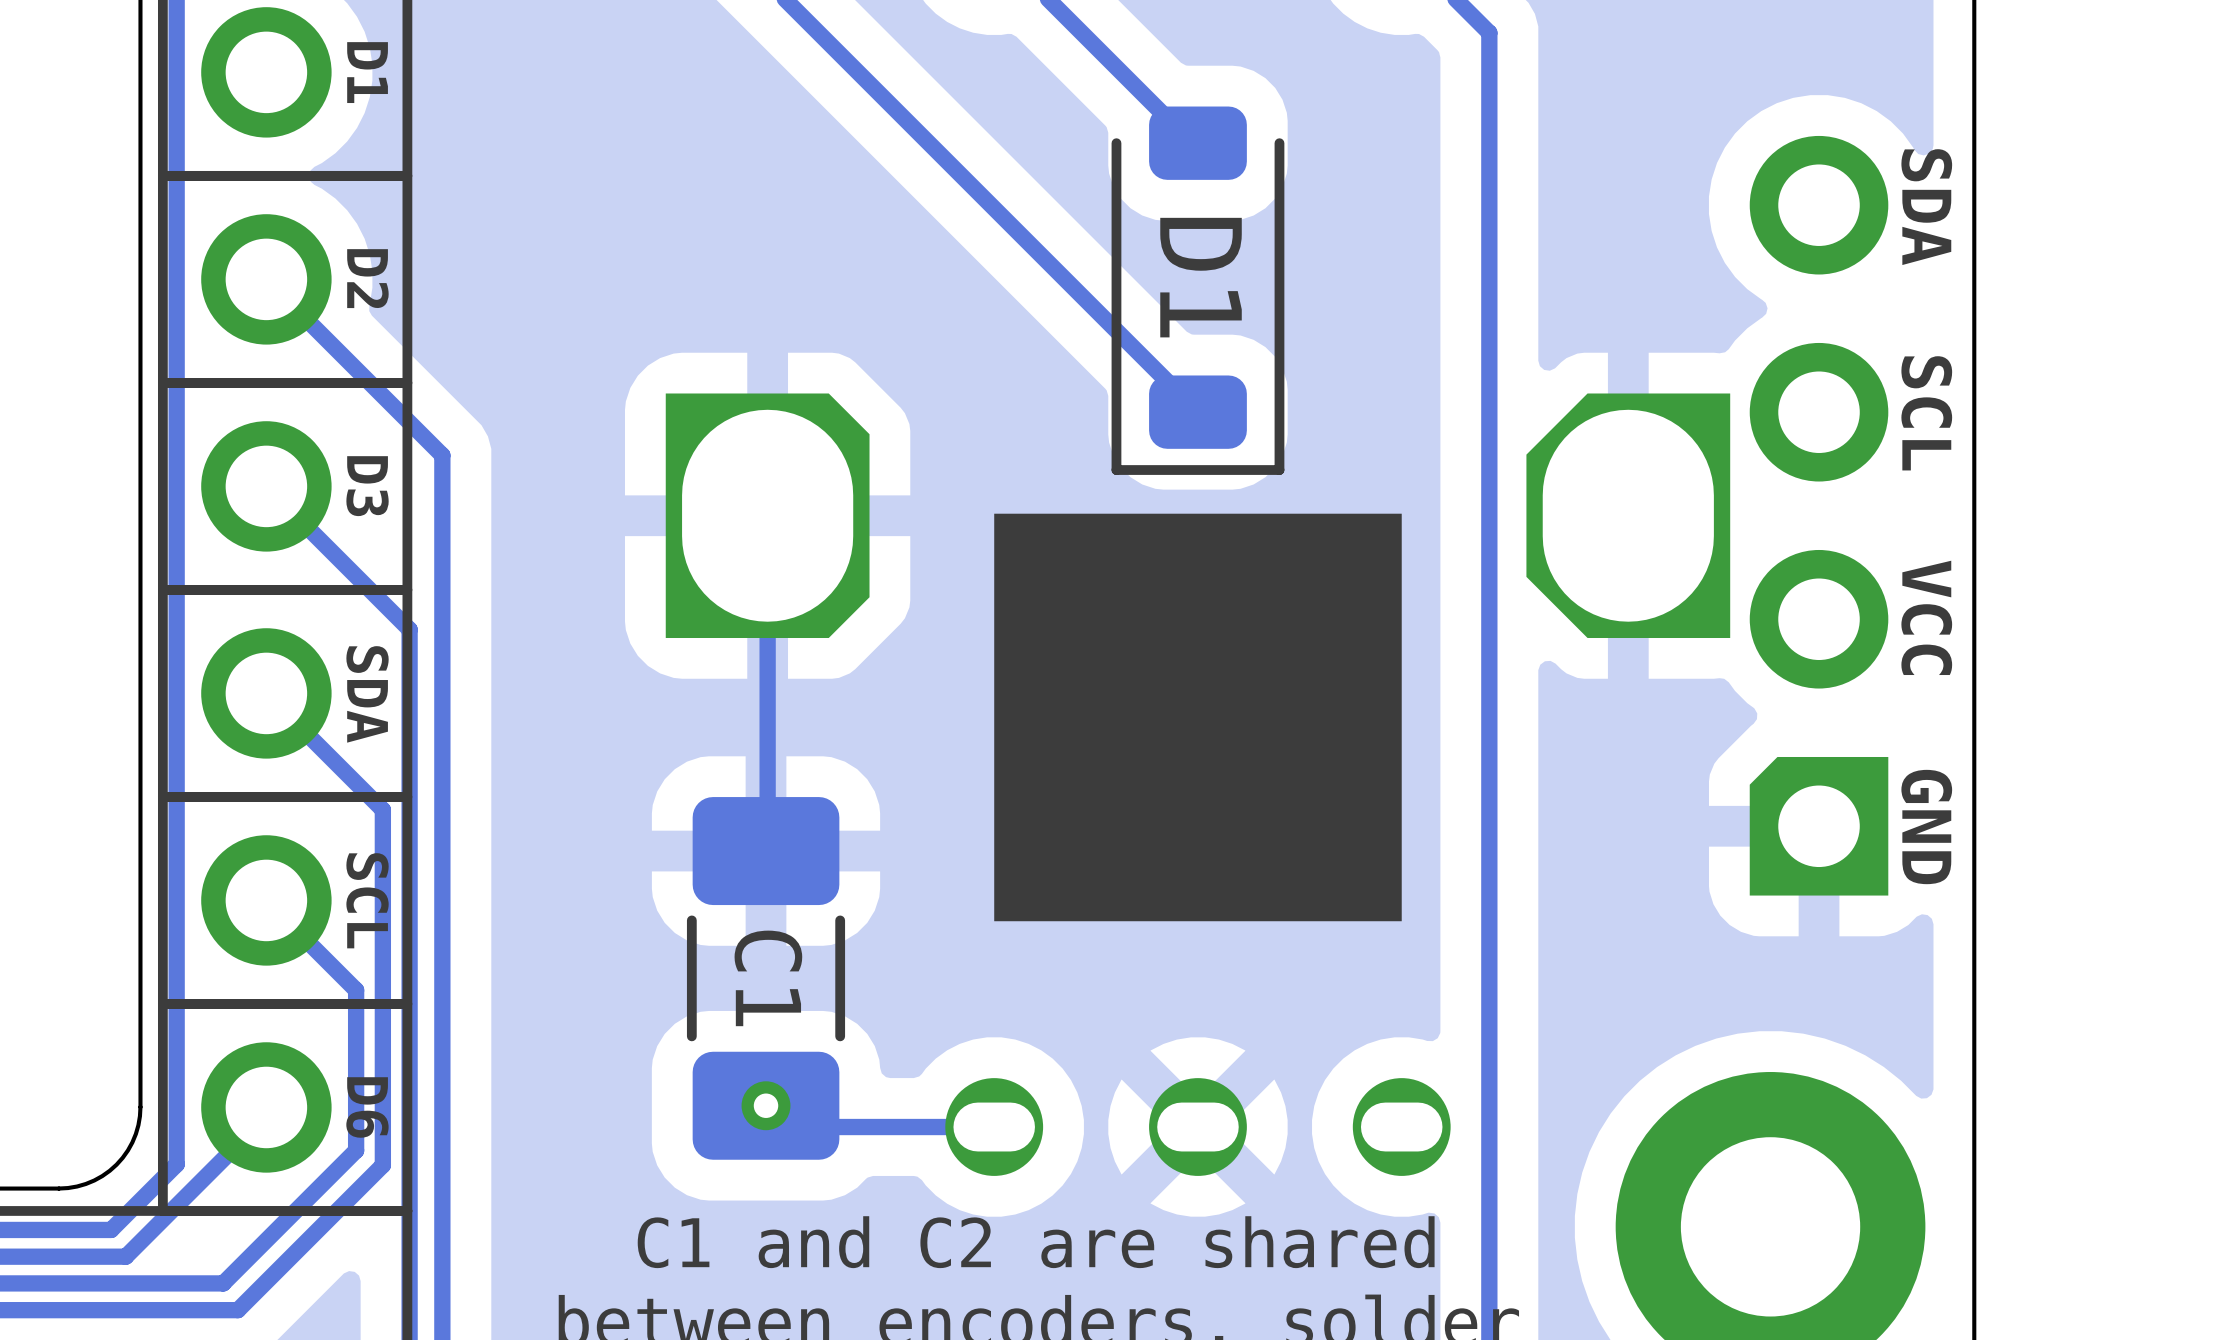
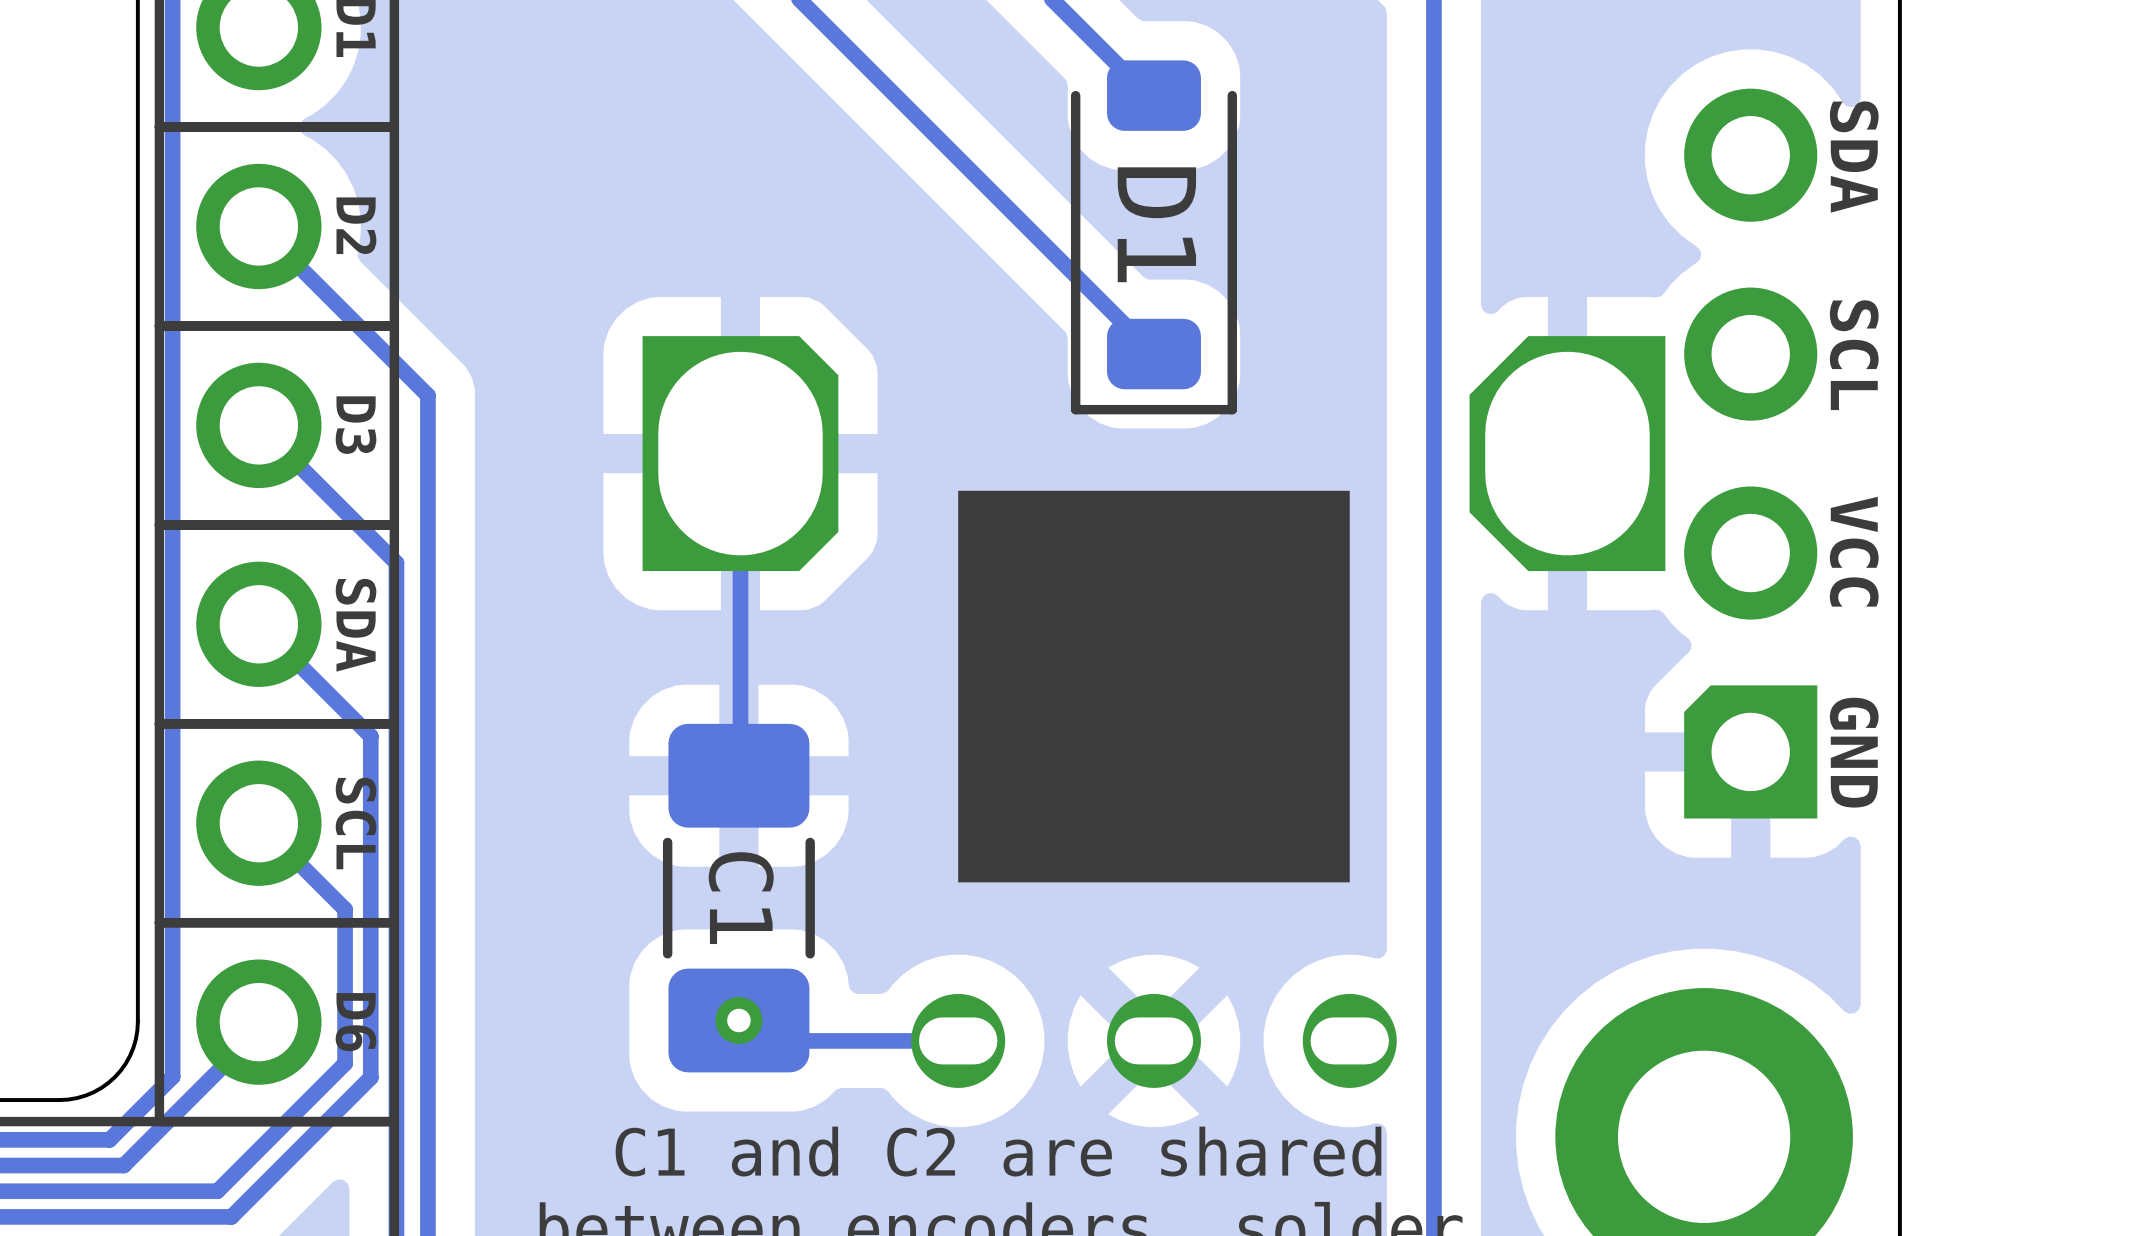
drawing position: (1197, 717) -> (1153, 686)

